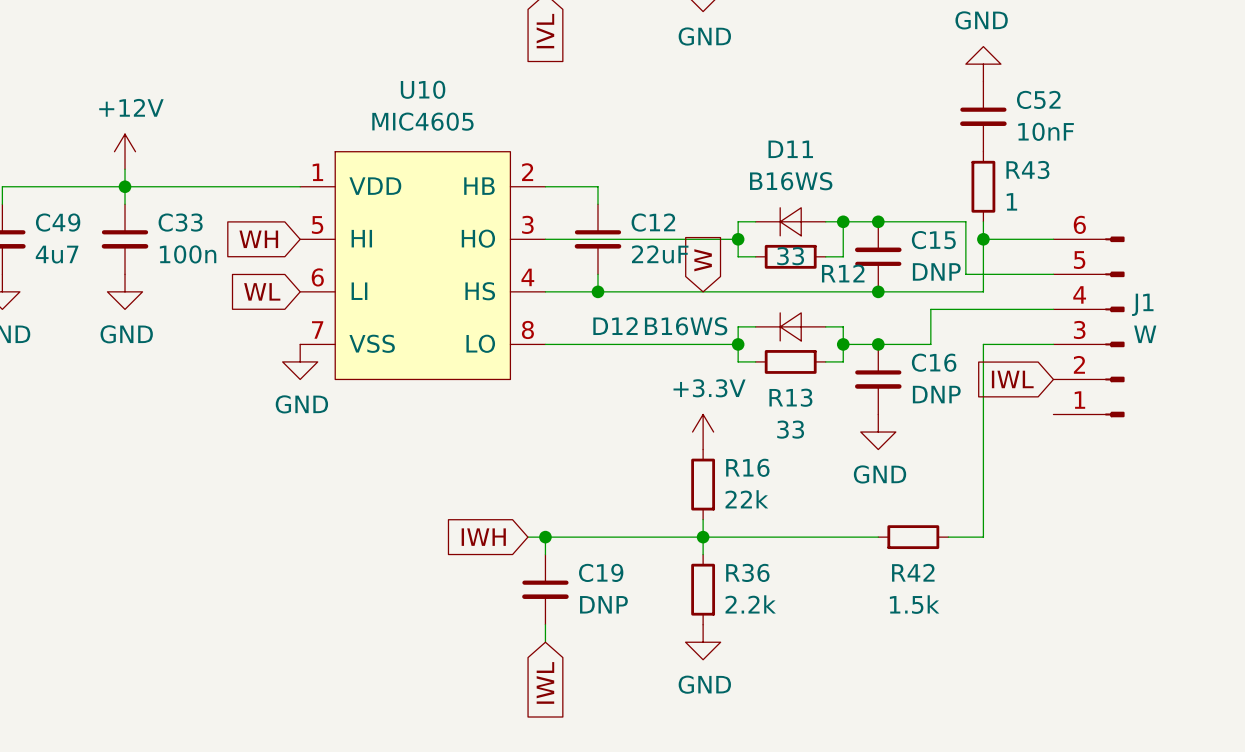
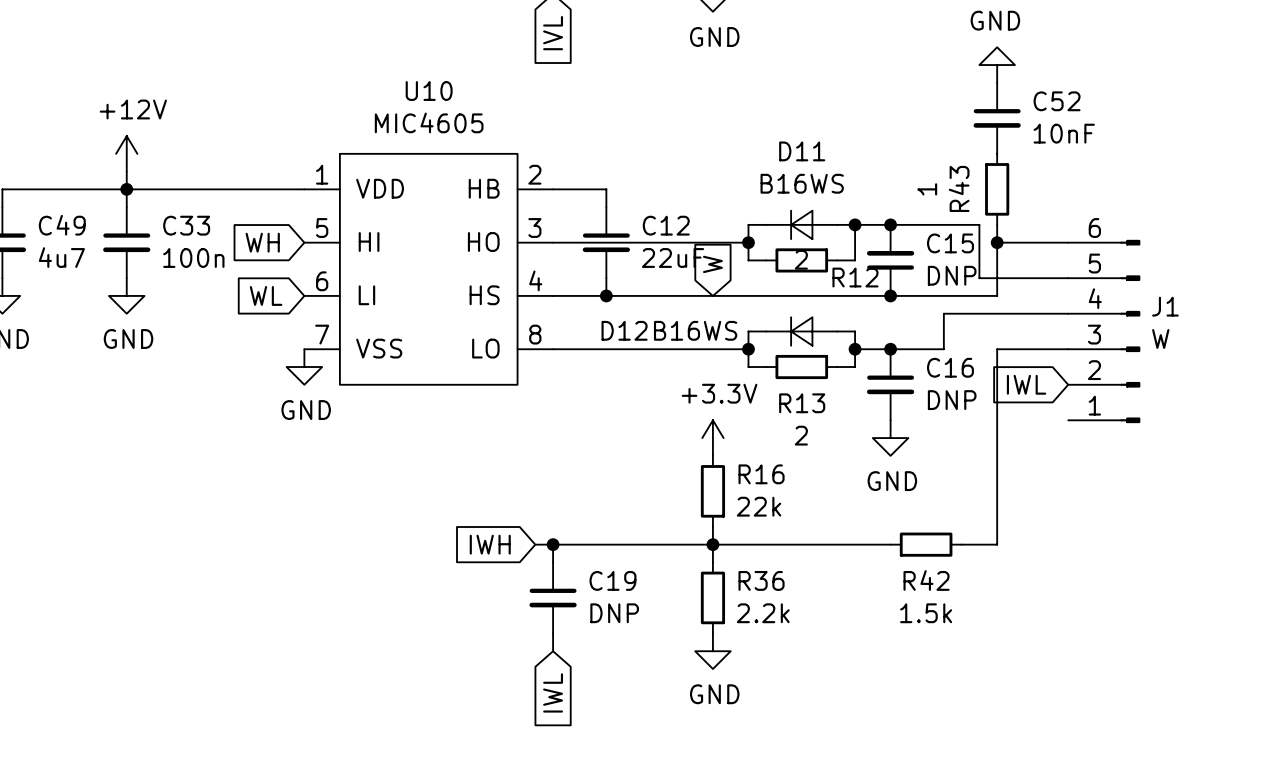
R43 name rotation: 0° (1027, 170) -> 90° counterclockwise (959, 188)
R43 name position: R43 (1027, 170) -> R43 (959, 188)
R43 value rotation: 0° (1011, 201) -> 90° counterclockwise (927, 189)
R43 value position: 1 (1011, 201) -> 1 (927, 189)
R12 value: 33 (790, 256) -> 2 (801, 259)
R13 value: 33 (790, 429) -> 2 (801, 435)

